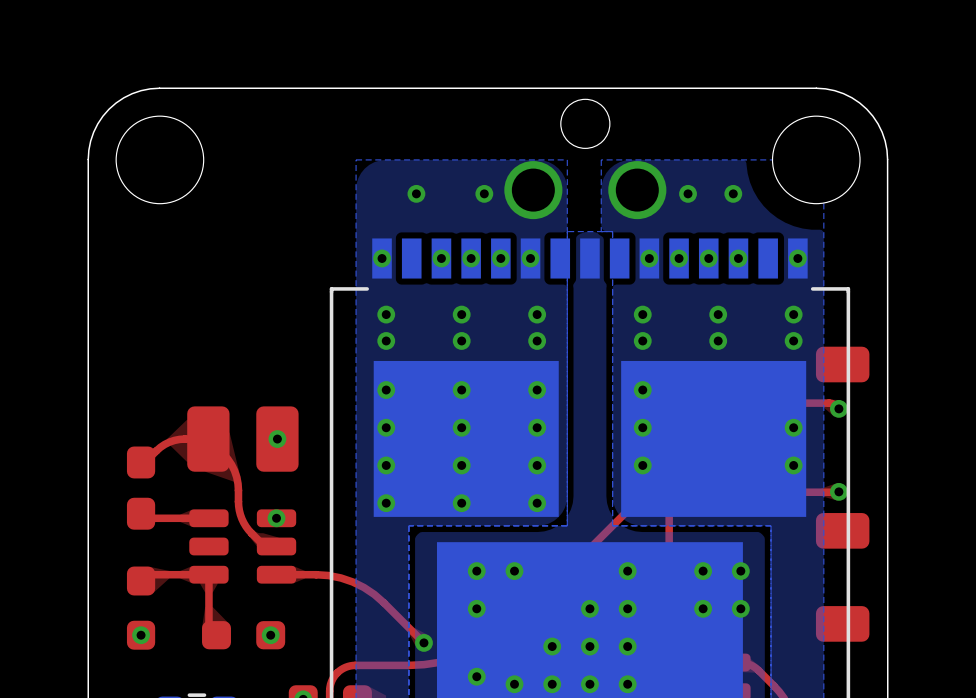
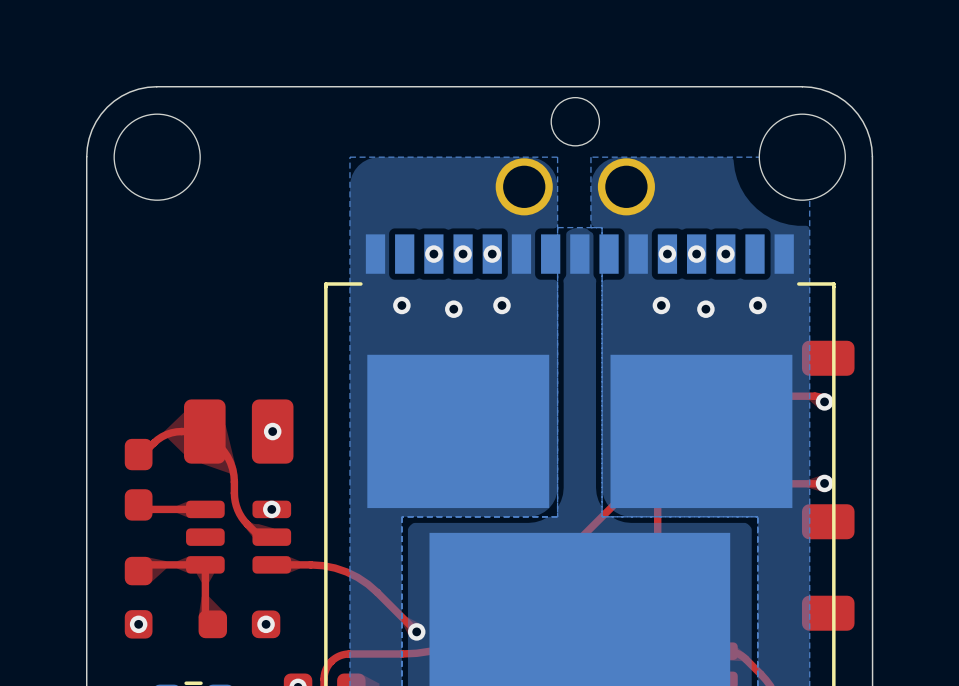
via: (416, 193) -> none
via: (484, 193) -> none
via: (688, 193) -> none
via: (733, 193) -> none
via: (382, 258) -> none
via: (530, 258) -> none
via: (649, 258) -> none
via: (797, 258) -> none
via: none -> (401, 305)
via: none -> (501, 305)
via: none -> (661, 305)
via: none -> (757, 305)
via: (386, 314) -> none
via: (537, 314) -> none
via: (642, 314) -> none
via: (793, 314) -> none
via: (386, 340) -> none
via: (461, 340) -> none
via: (537, 340) -> none
via: (642, 340) -> none
via: (718, 340) -> none
via: (793, 340) -> none
via: (386, 390) -> none
via: (461, 390) -> none
via: (537, 390) -> none
via: (642, 390) -> none
via: (386, 427) -> none
via: (461, 427) -> none
via: (537, 427) -> none
via: (642, 427) -> none
via: (793, 427) -> none
via: (386, 465) -> none
via: (461, 465) -> none
via: (537, 465) -> none
via: (642, 465) -> none
via: (793, 465) -> none
via: (386, 503) -> none
via: (461, 503) -> none
via: (537, 503) -> none
via: (476, 571) -> none
via: (514, 571) -> none
via: (627, 571) -> none
via: (703, 571) -> none
via: (740, 571) -> none
via: (476, 608) -> none
via: (589, 608) -> none
via: (627, 608) -> none
via: (703, 608) -> none
via: (740, 608) -> none
via: (552, 646) -> none
via: (589, 646) -> none
via: (627, 646) -> none
via: (476, 676) -> none
via: (514, 684) -> none
via: (552, 684) -> none
via: (589, 684) -> none
via: (627, 684) -> none

